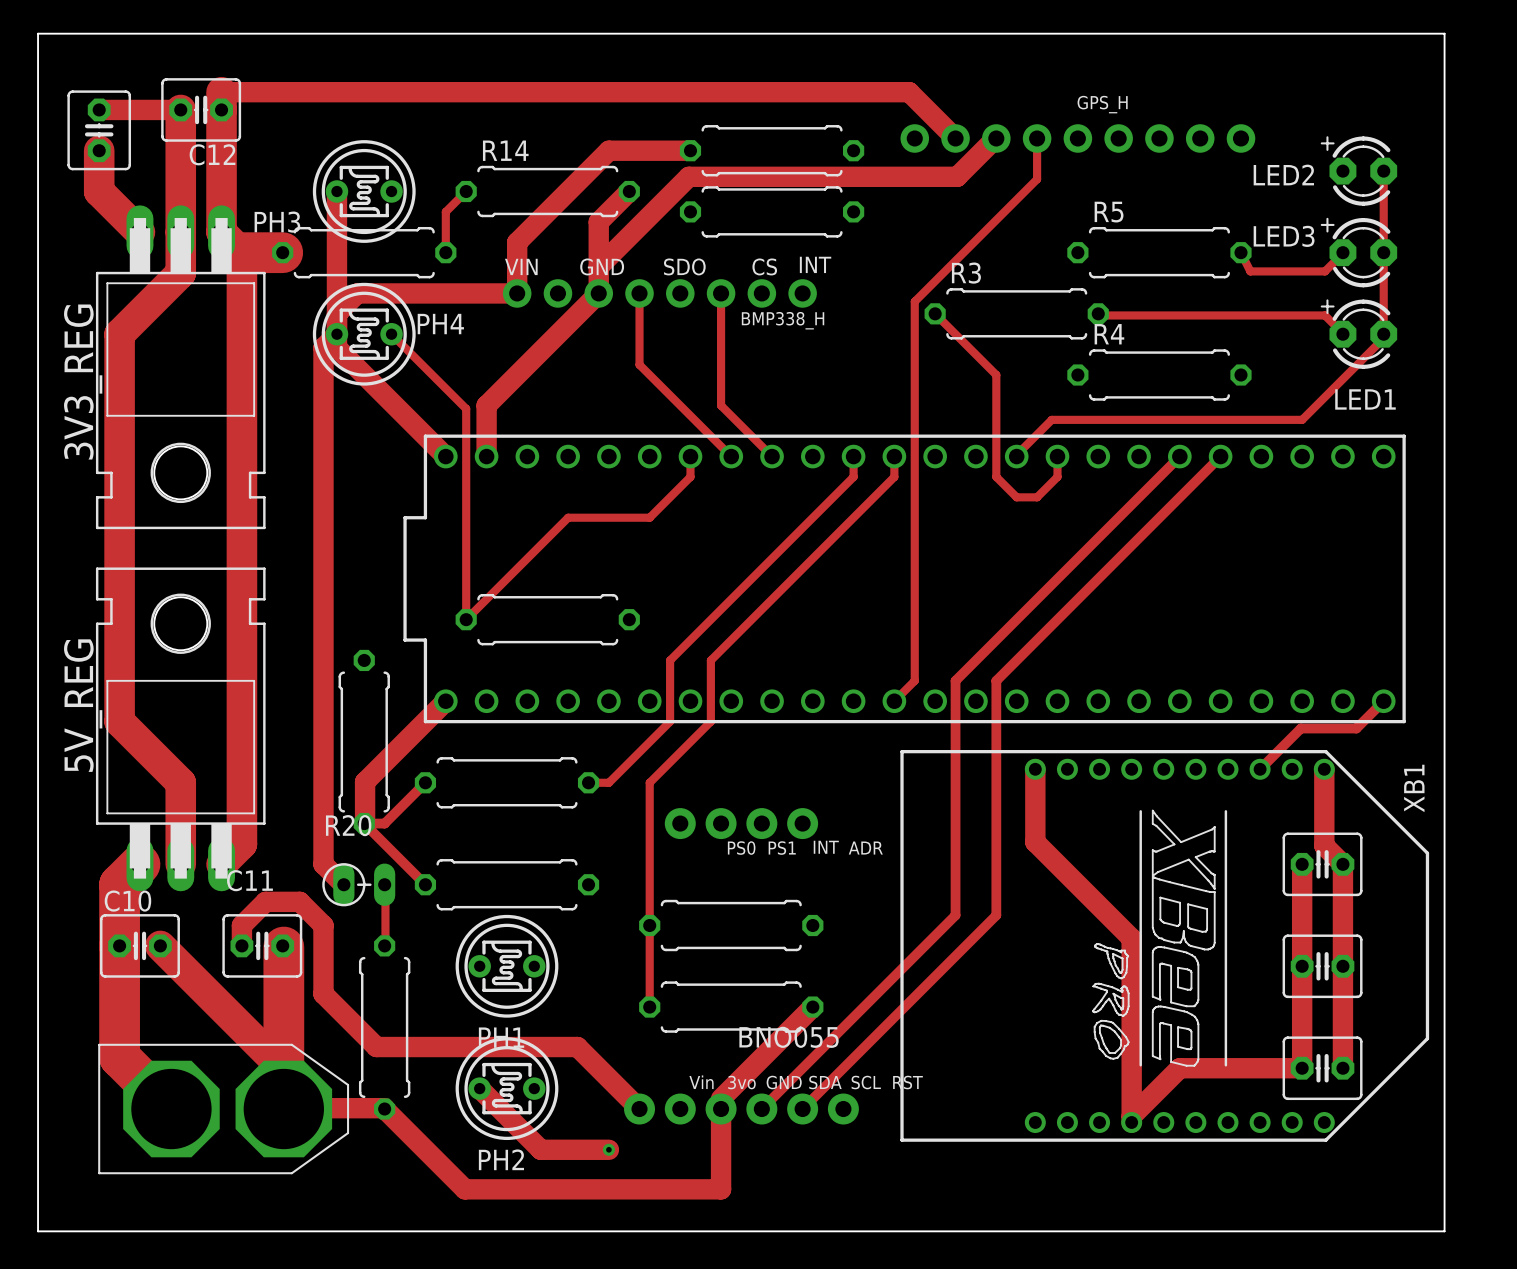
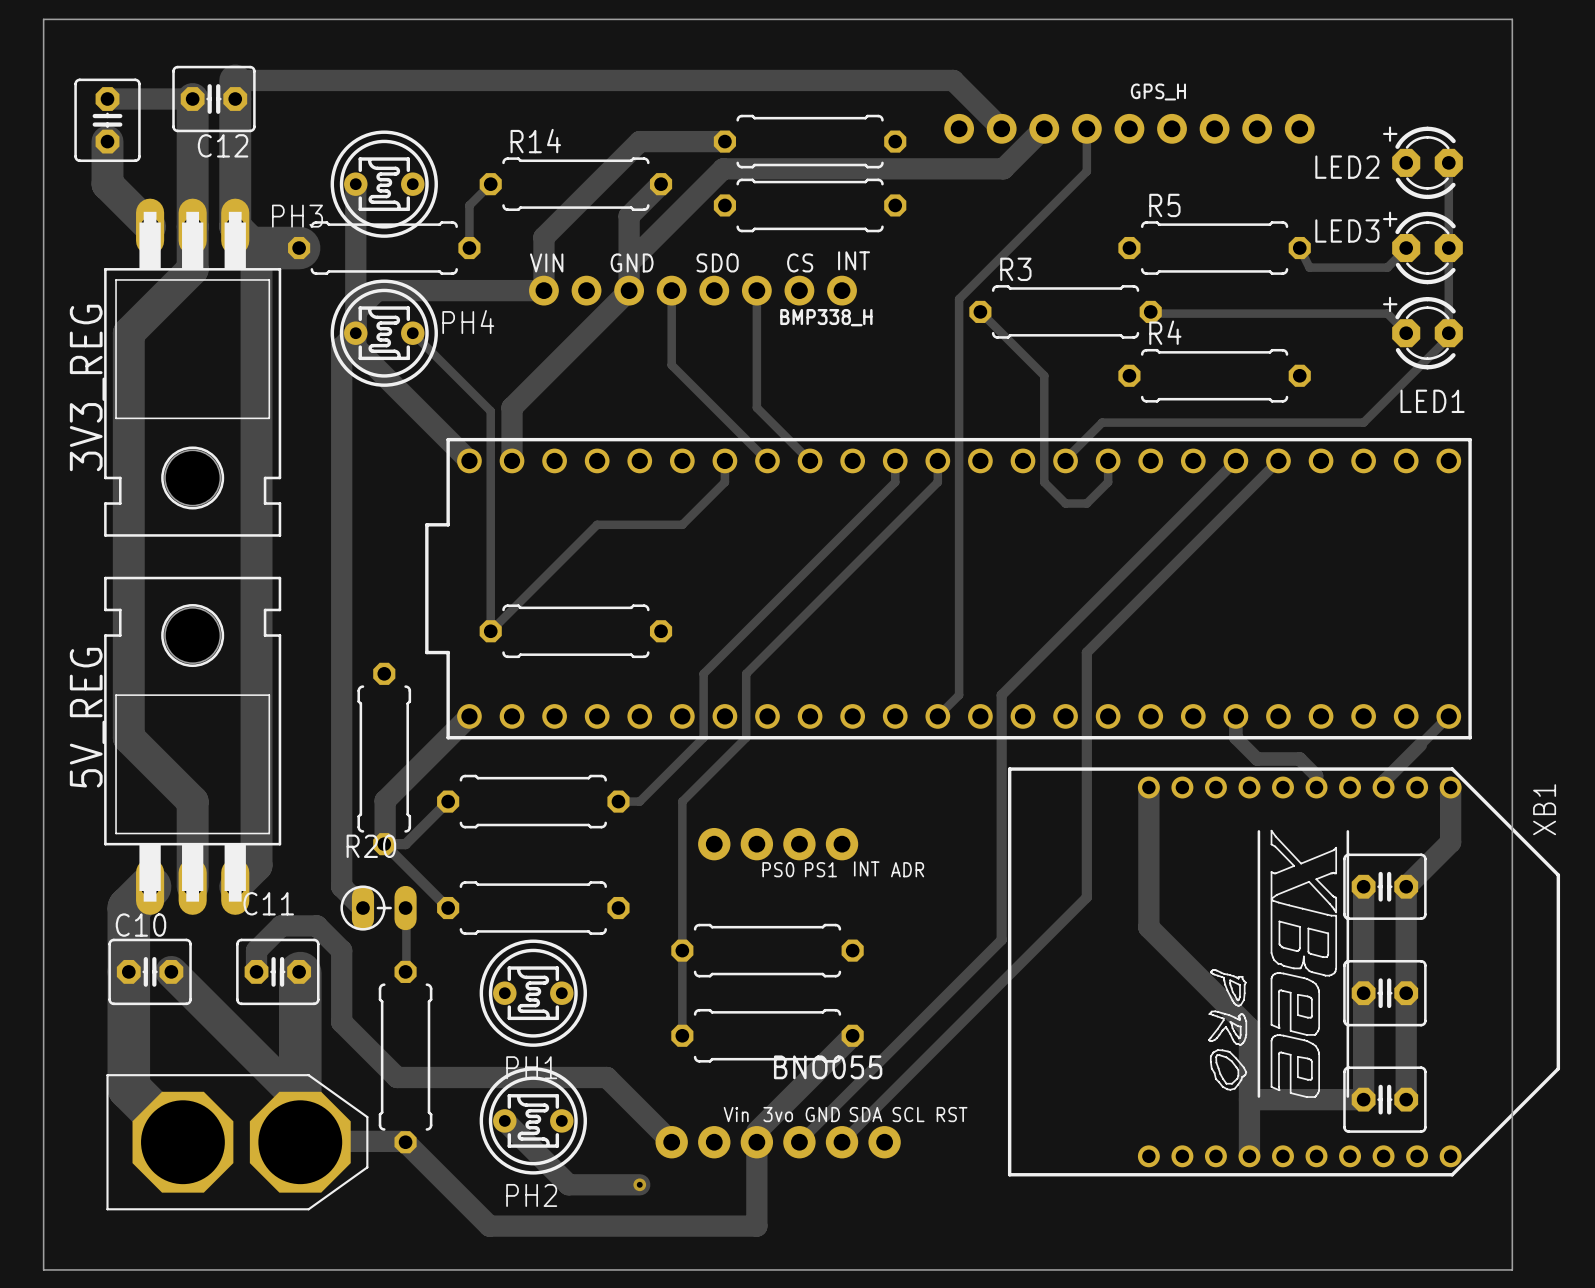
track: (1037, 640) (996, 680) (996, 915) -> (1086, 652) (1086, 897) (1044, 939)
track: none -> (1235, 716) (1235, 737) (1257, 759) (1299, 759) (1316, 775) (1316, 787)
track: (1356, 728) (1300, 728) (1260, 769) -> (1420, 744) (1383, 781) (1383, 787)
track: (1035, 769) (1035, 842) (1096, 903) -> (1148, 787) (1148, 927)
track: (1324, 769) (1324, 845) (1342, 864) -> (1450, 787) (1450, 842) (1406, 886)
track: (1131, 938) (1131, 1122) (1131, 1116) (1179, 1068) (1192, 1068) -> (1185, 964) (1249, 1028) (1249, 1156)
XB1 position: (1164, 945) -> (1283, 971)

